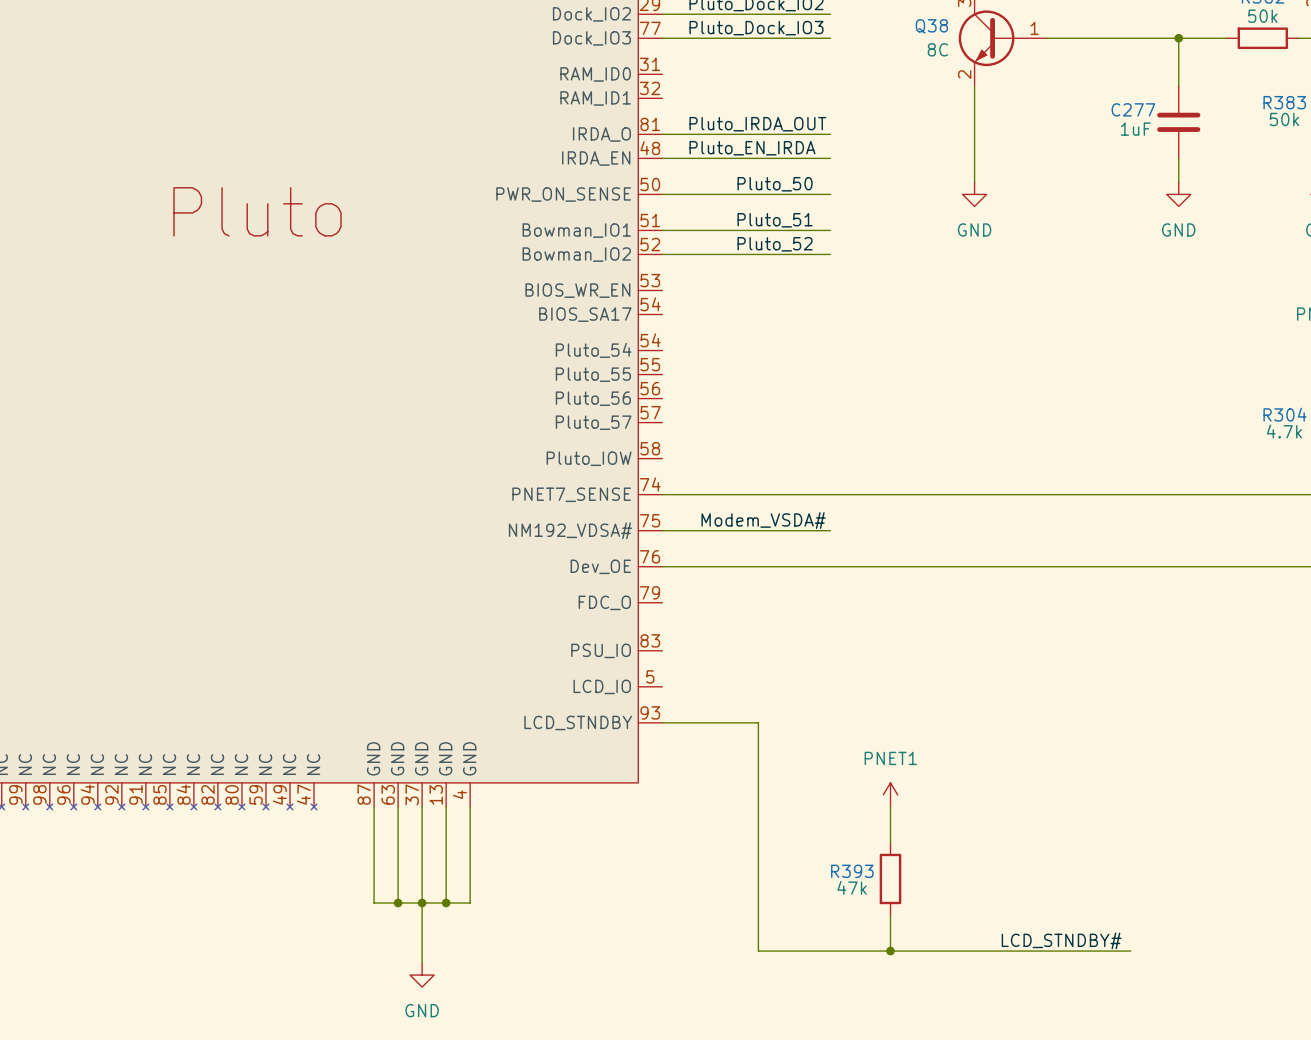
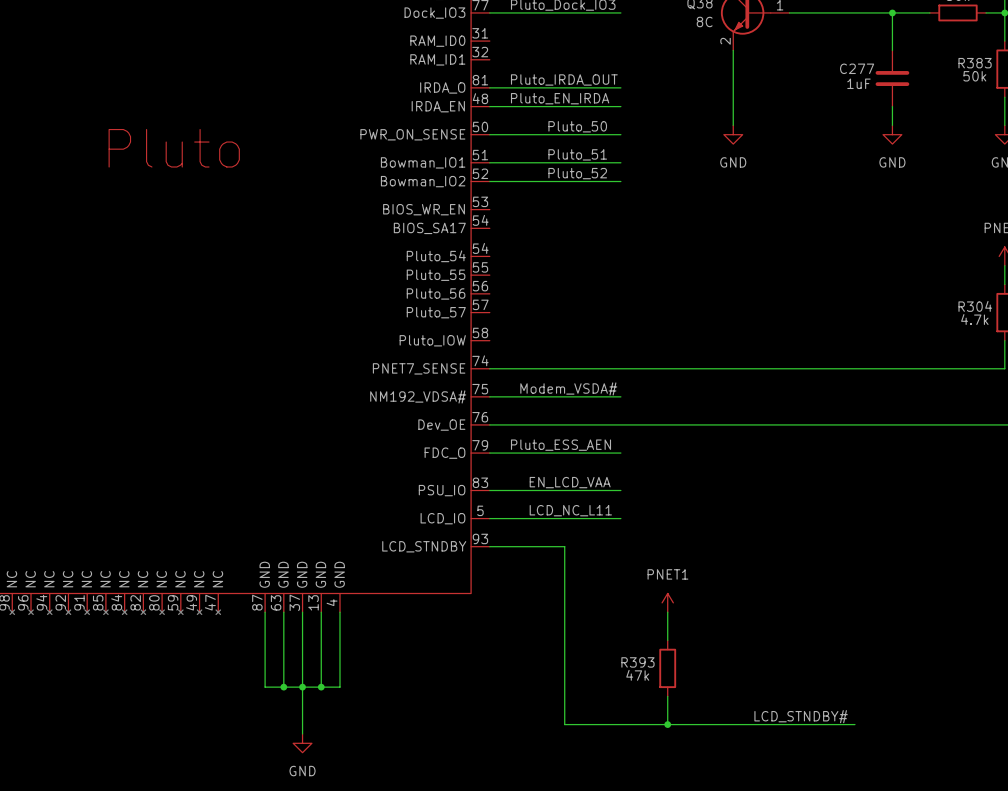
label: none -> Pluto_ESS_AEN (561, 445)
wire: none -> (489, 453) (620, 453)
label: none -> EN_LCD_VAA (570, 482)
wire: none -> (489, 490) (620, 490)
label: none -> LCD_NC_L11 (570, 510)
wire: none -> (489, 518) (620, 518)

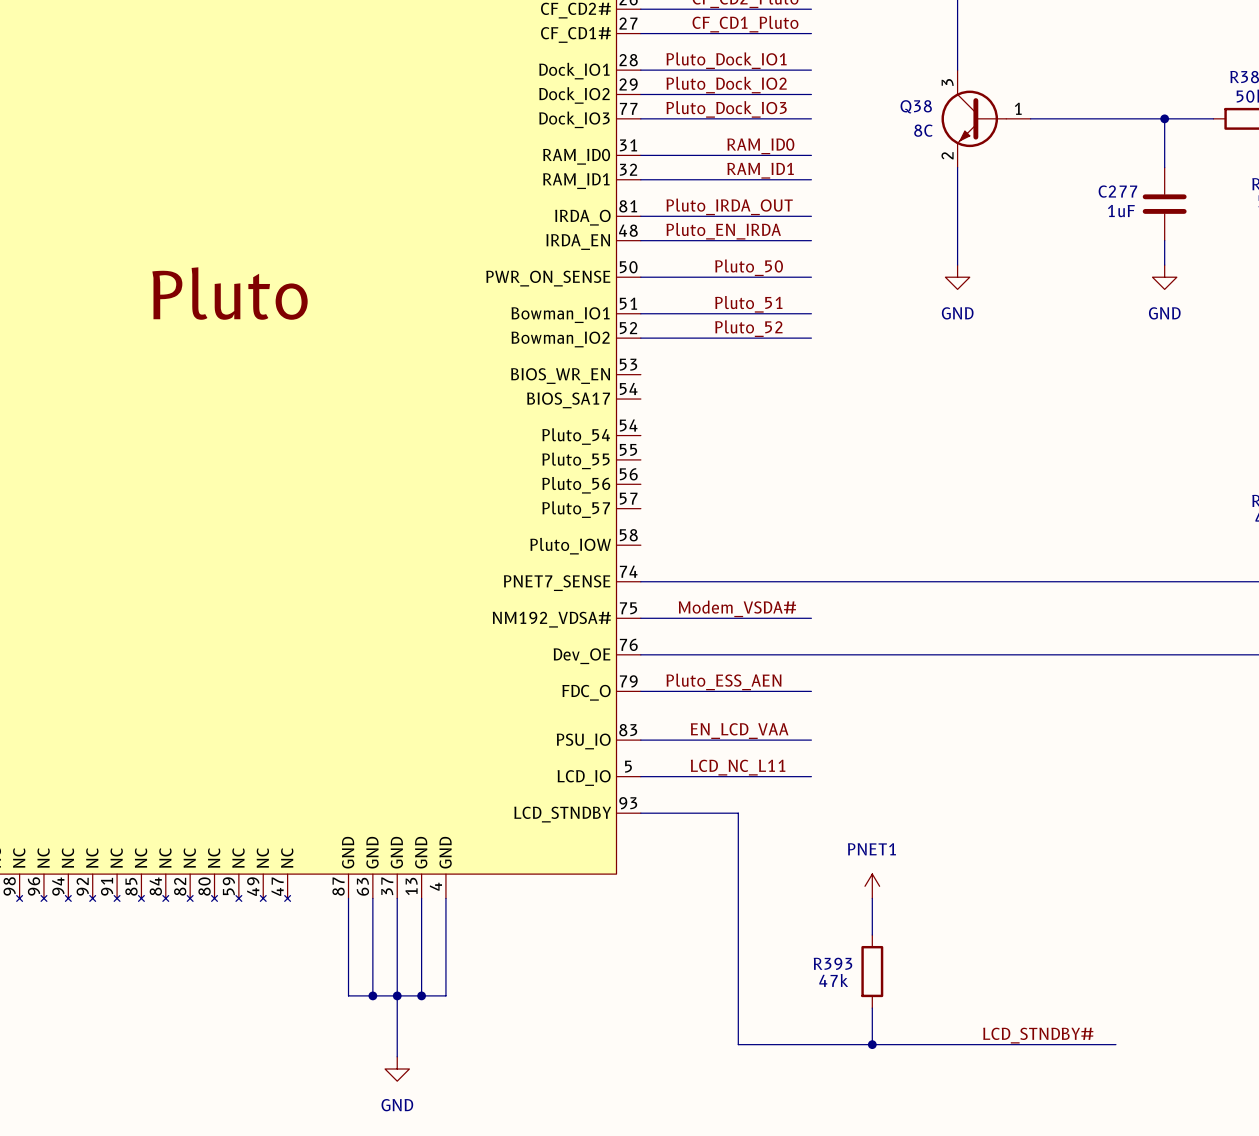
label: none -> RAM_ID0 (760, 146)
wire: none -> (640, 155) (811, 155)
label: none -> RAM_ID1 (760, 170)
wire: none -> (640, 179) (811, 179)

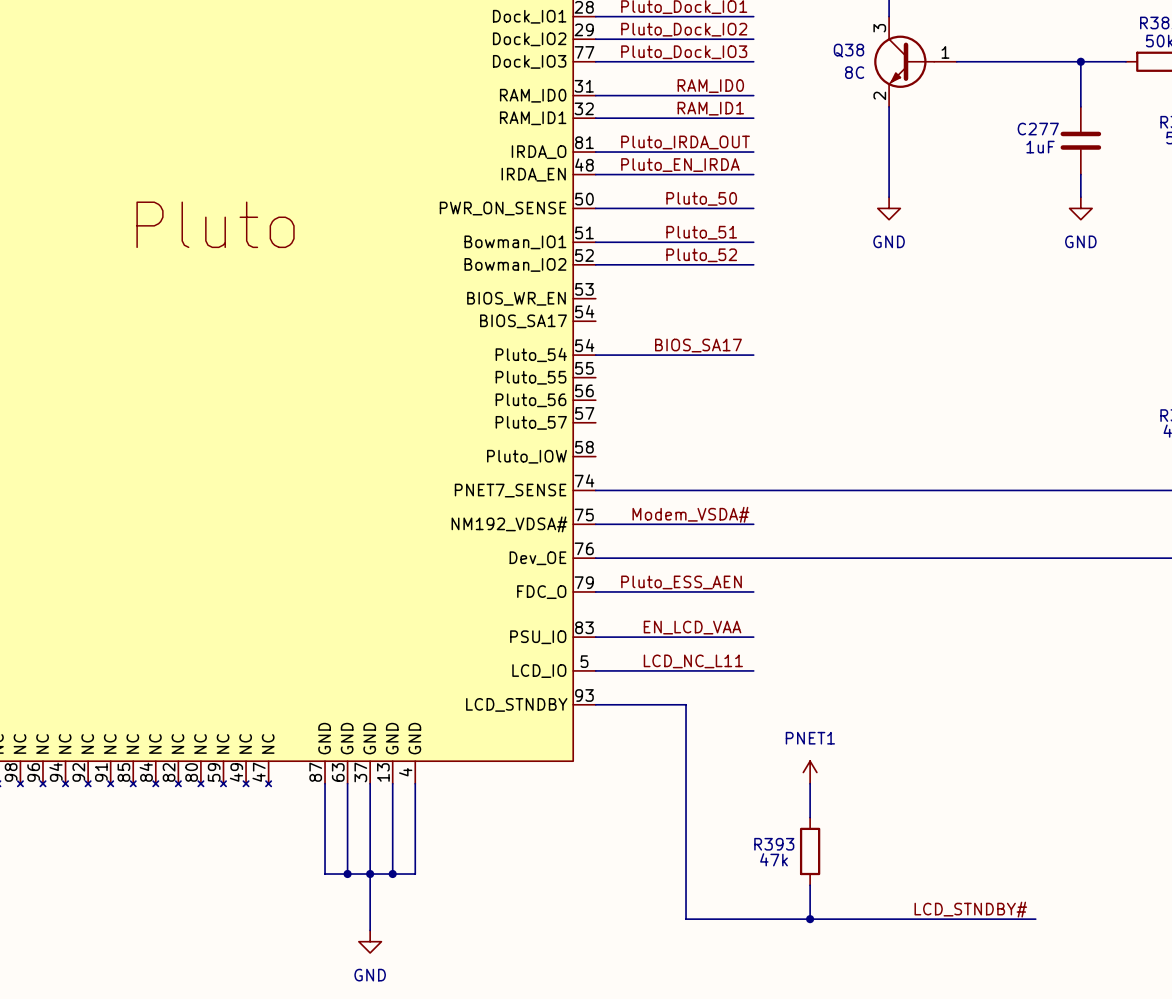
label: none -> BIOS_SA17 (698, 345)
wire: none -> (595, 355) (753, 355)

